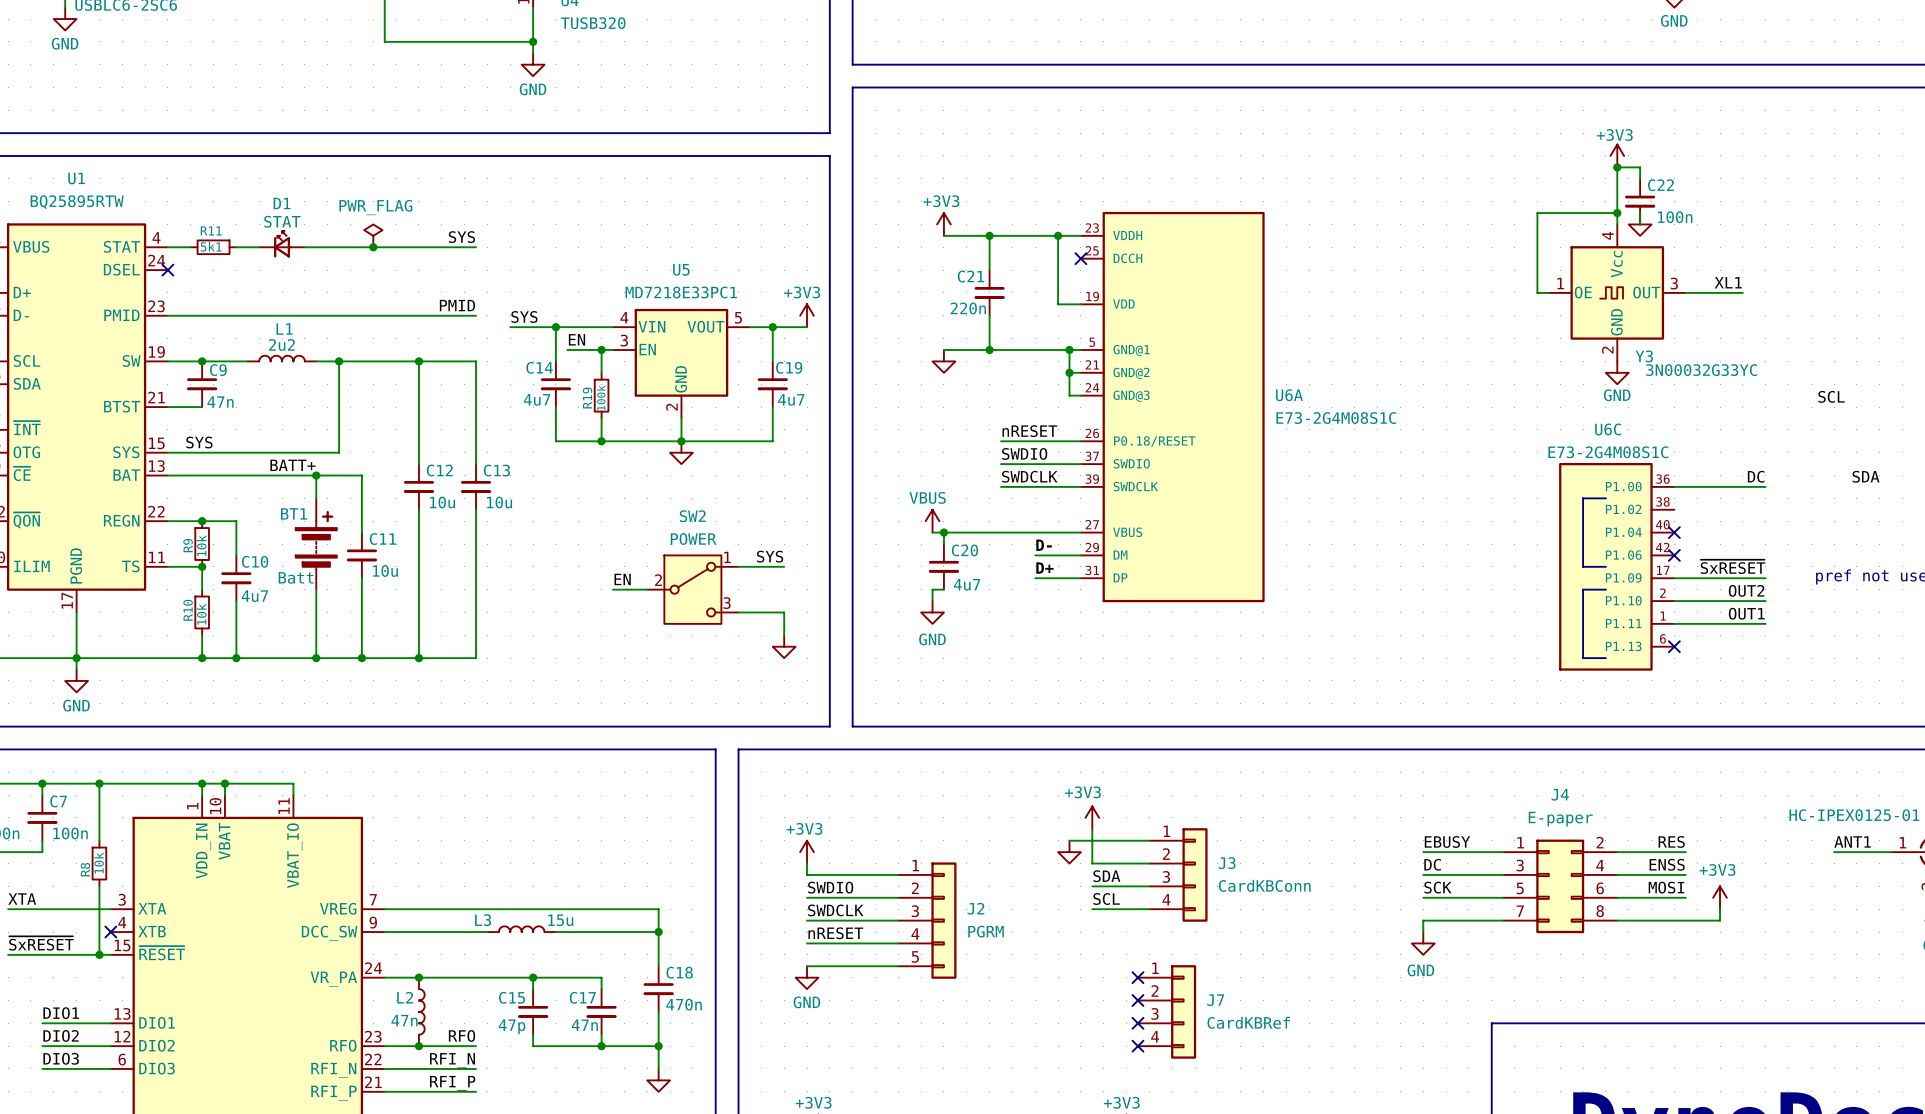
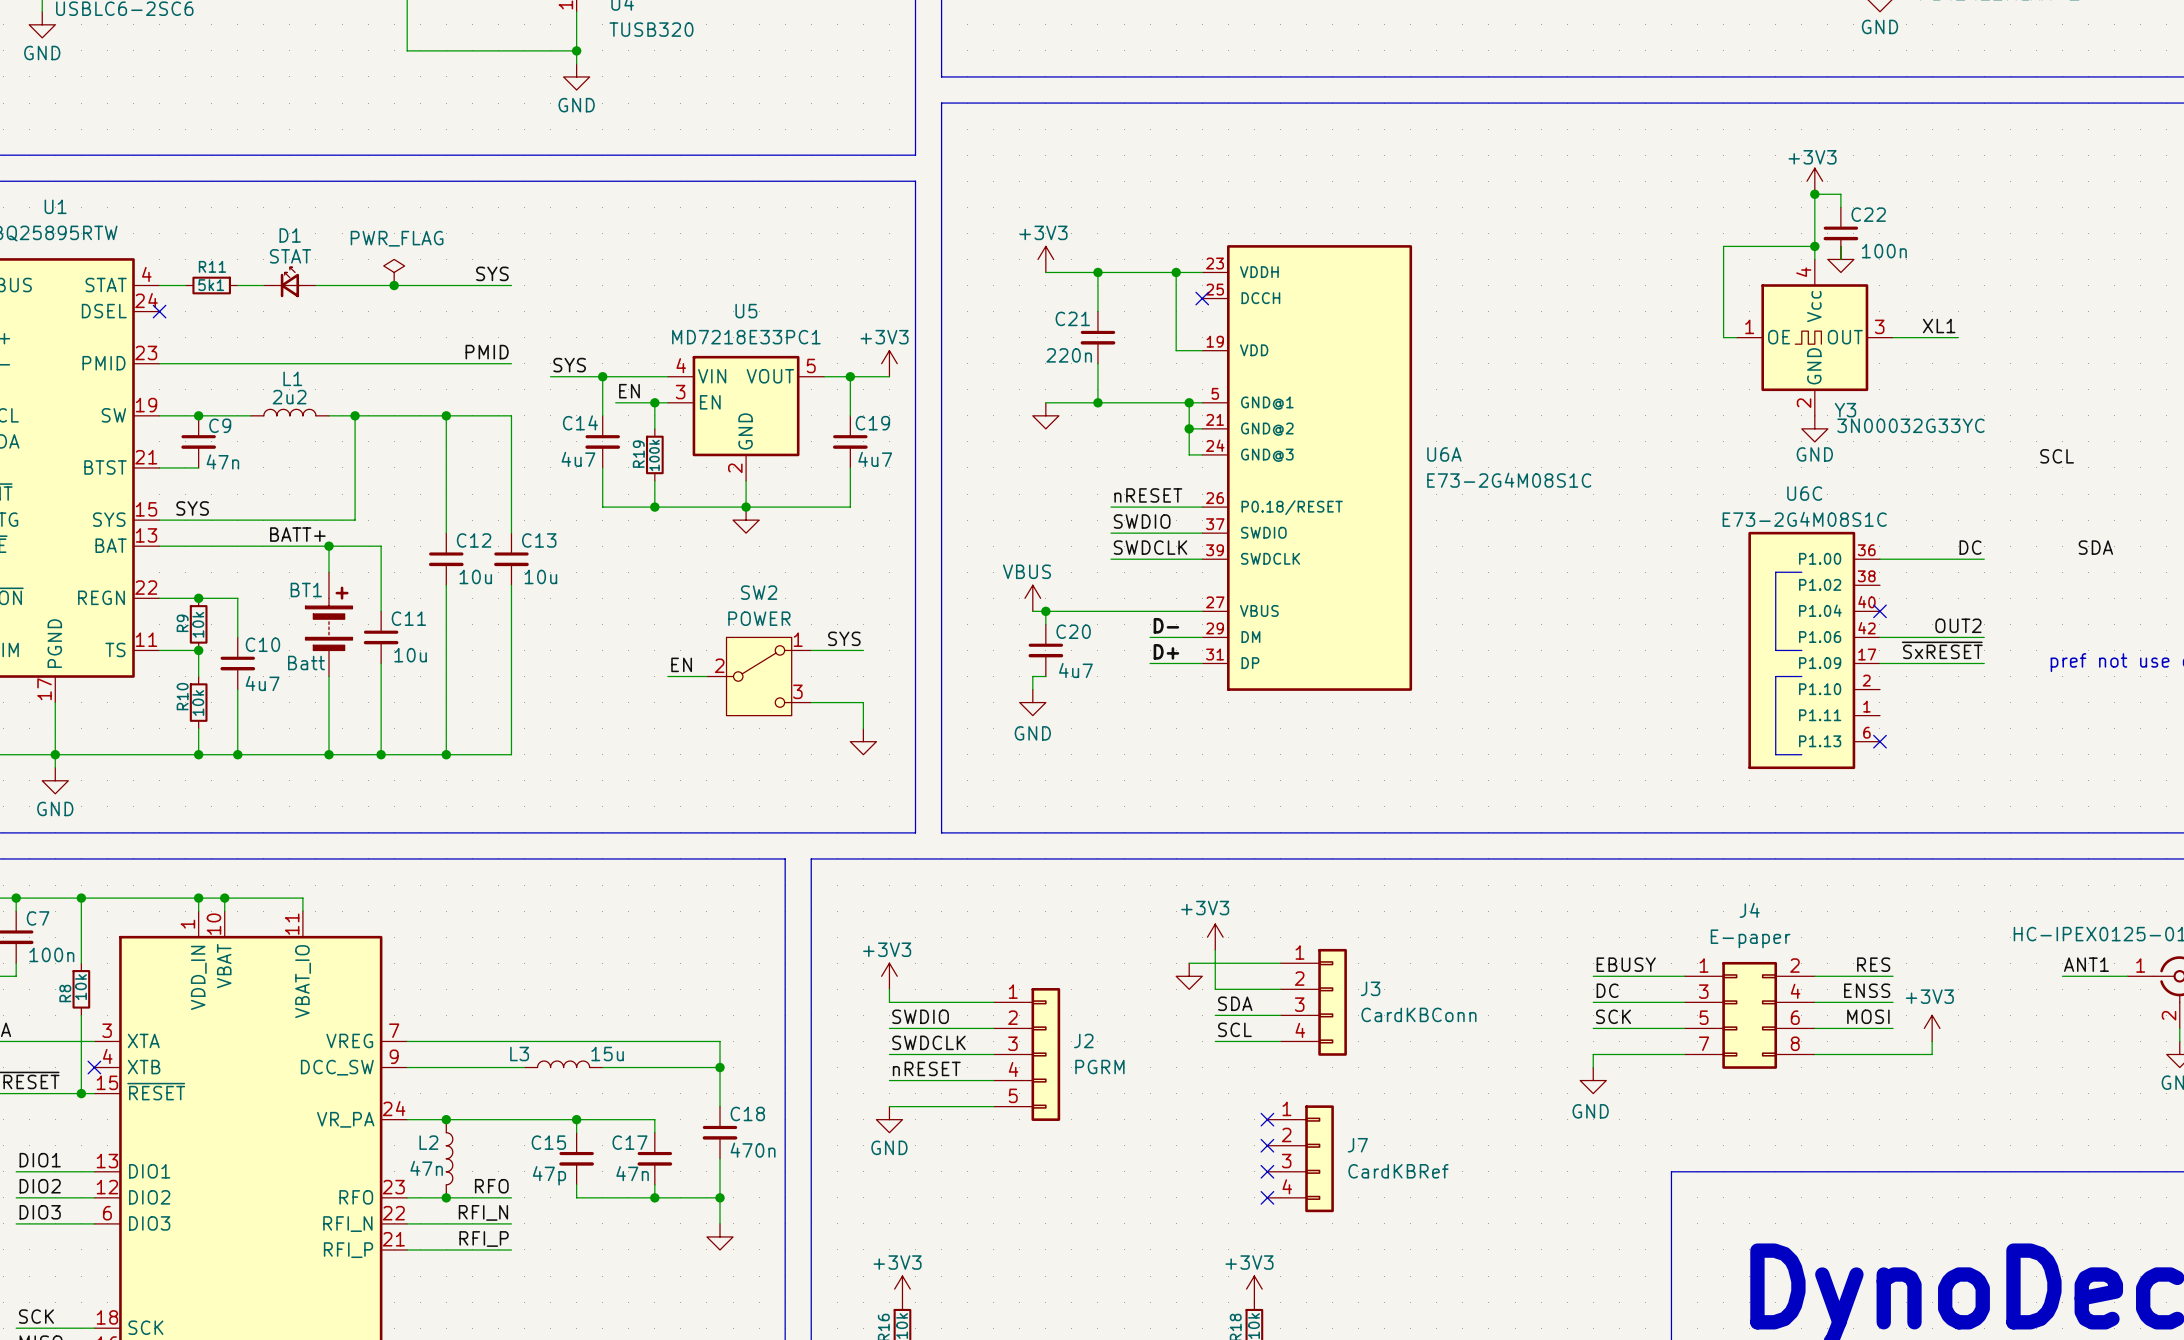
no-connect mark: (1674, 555) -> none
label position: OUT2 (1746, 590) -> OUT2 (1958, 625)
wire: (1674, 601) (1765, 601) -> (1879, 637) (1984, 637)
label: OUT1 (1746, 613) -> none
wire: (1674, 623) (1765, 623) -> none

